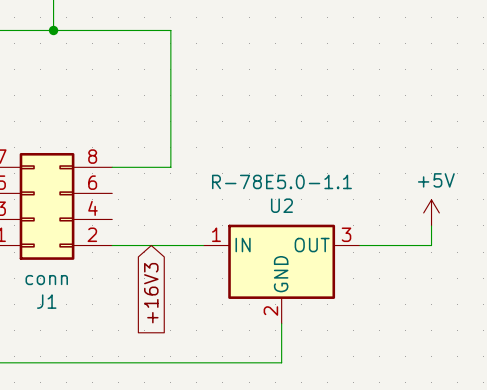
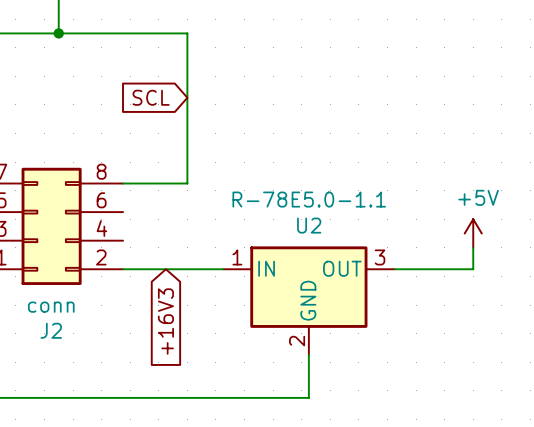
global label: none -> SCL (151, 97)
J1 name: J1 (46, 301) -> J2 (51, 330)

